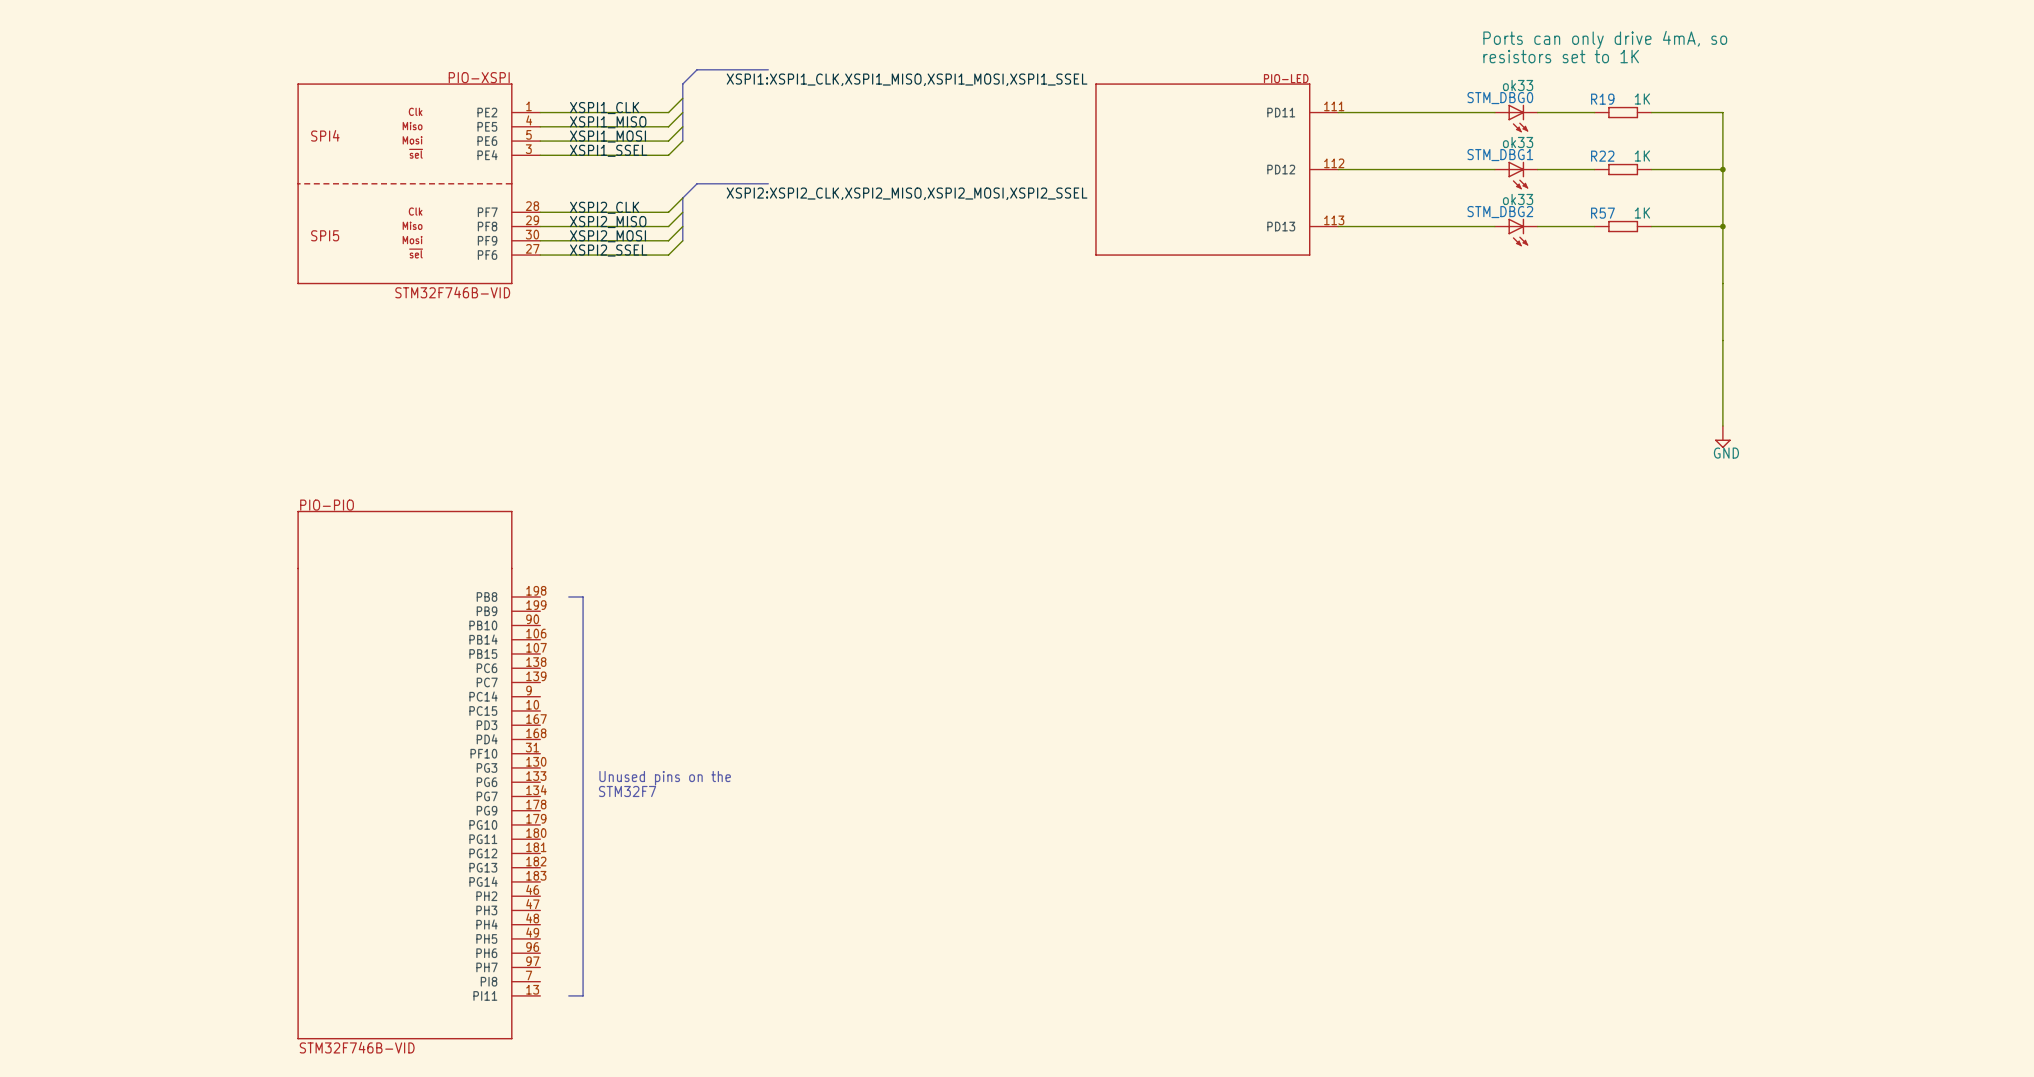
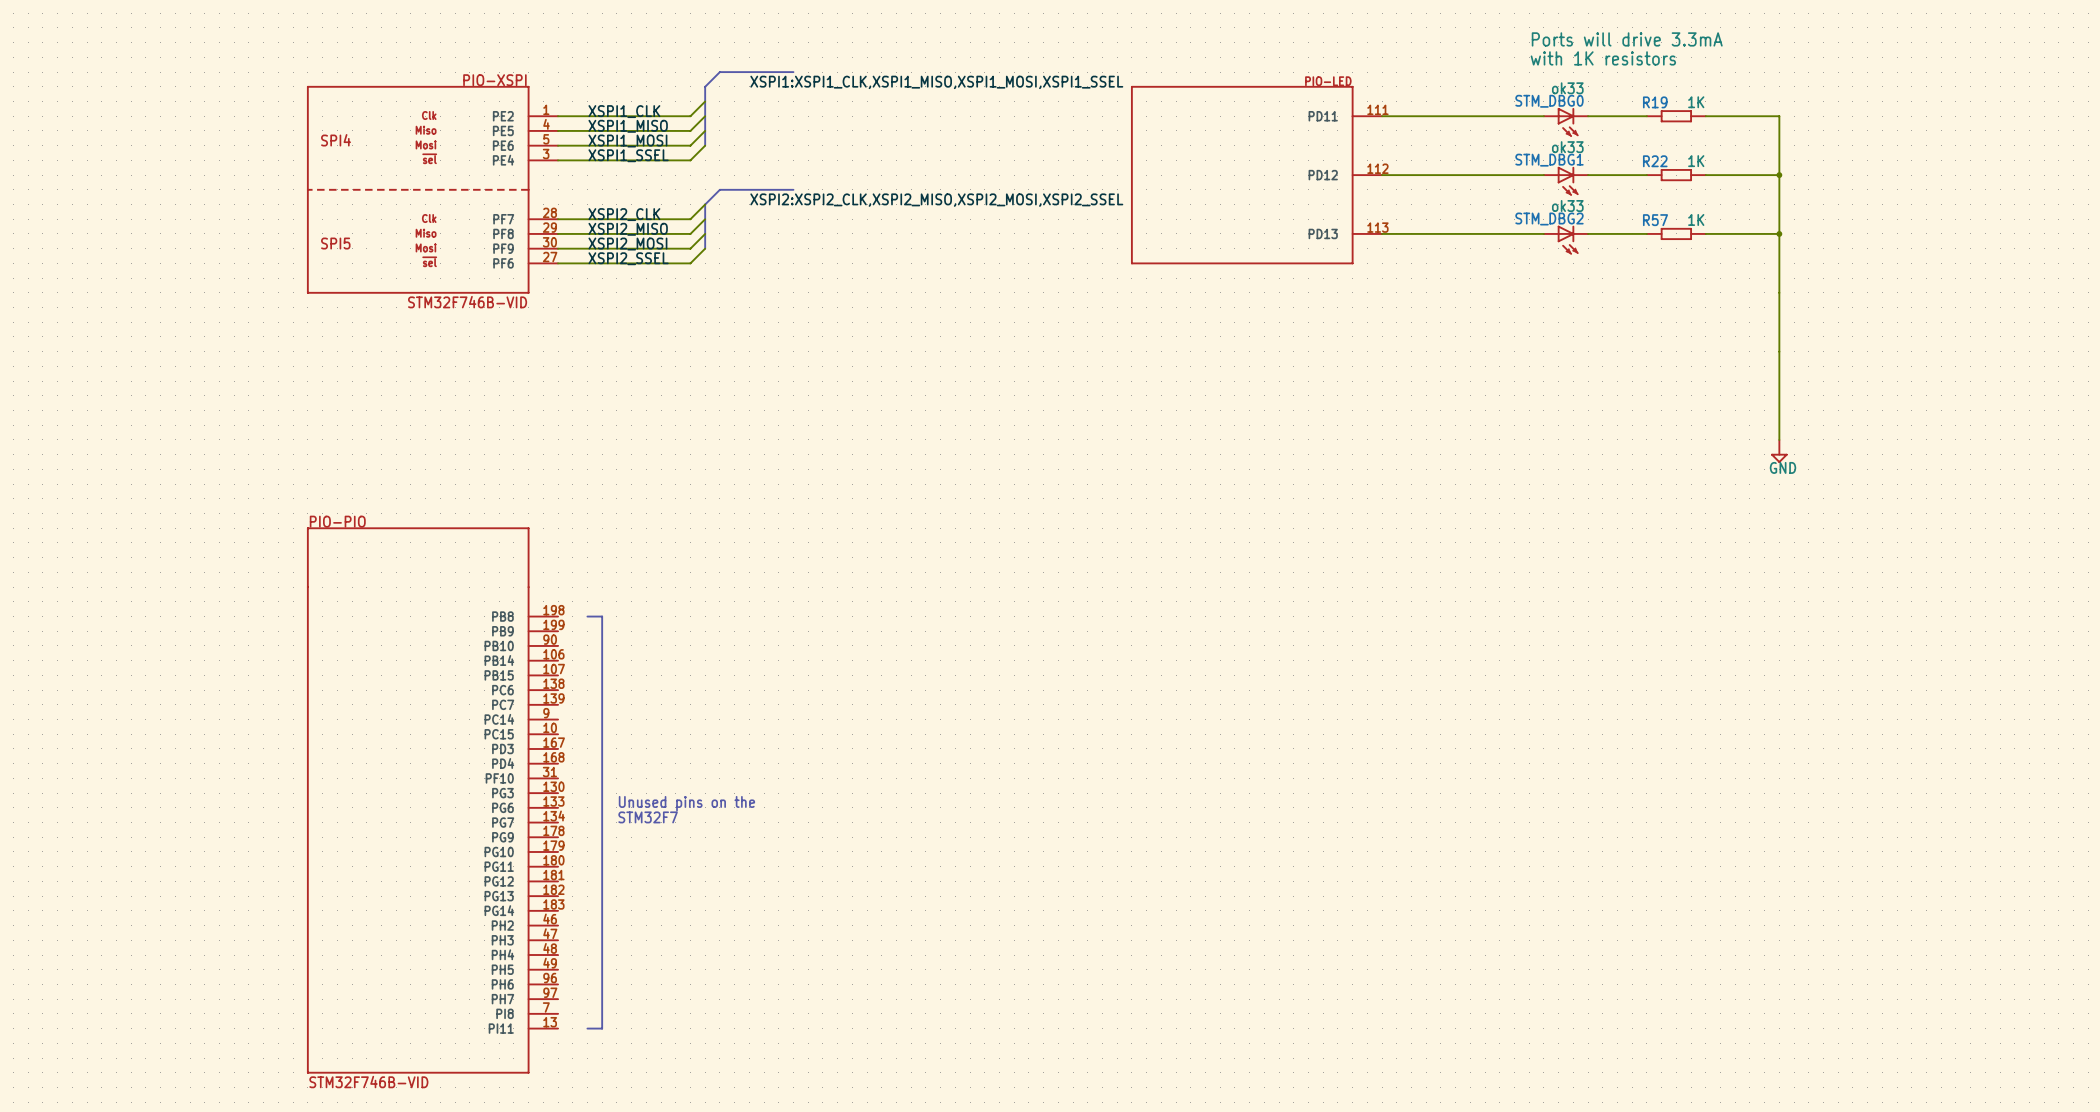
text: Ports can only drive 4mA, so (1605, 39) -> Ports will drive 3.3mA (1627, 39)
text: resistors set to 1K (1561, 56) -> with 1K resistors (1603, 58)

